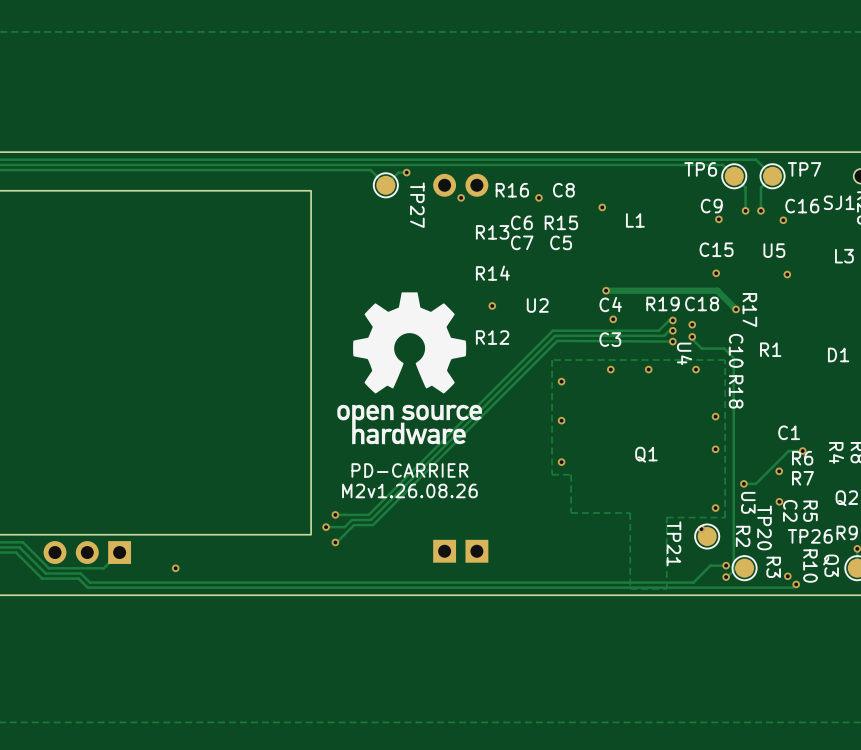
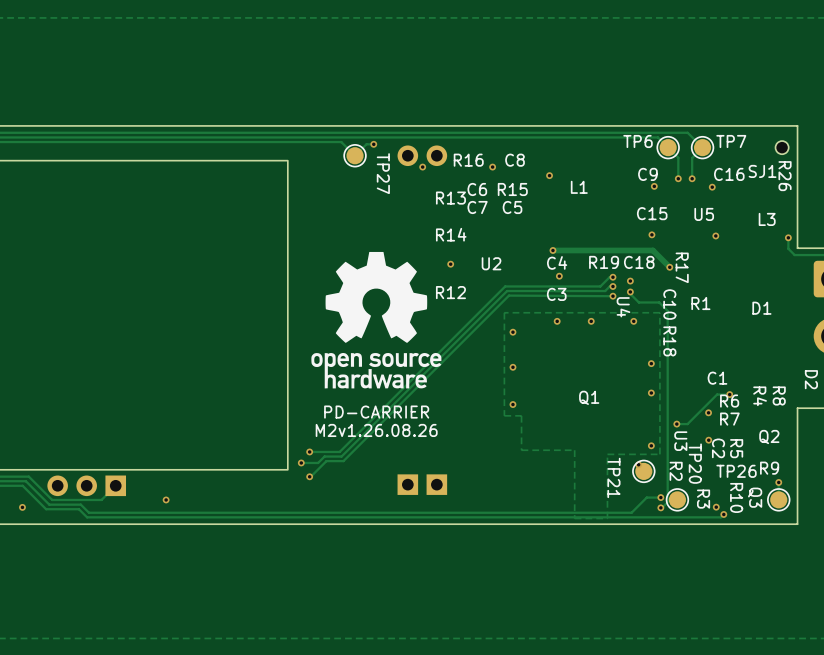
via: none -> (22, 507)

